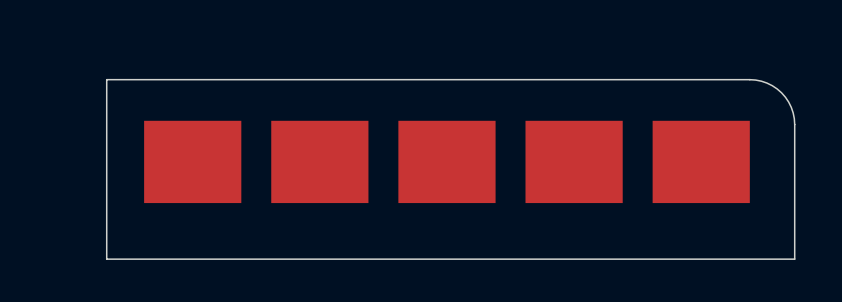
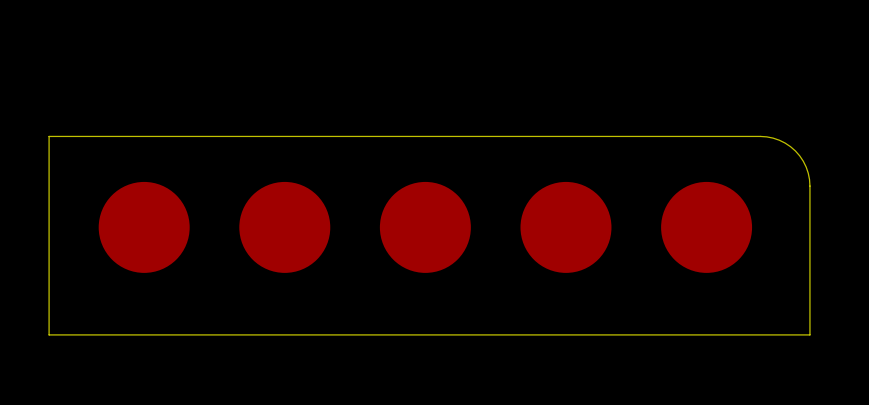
part footprint: [144, 120, 750, 204] -> [98, 181, 753, 273]

